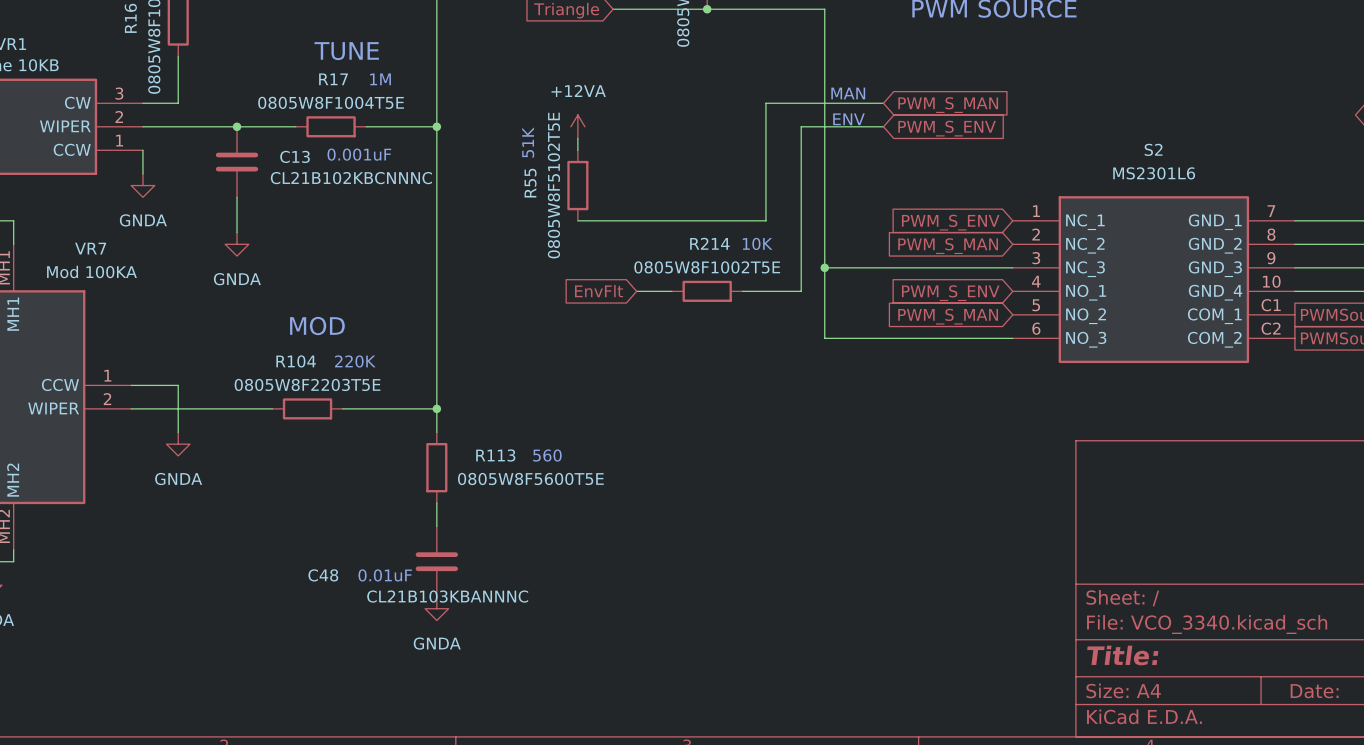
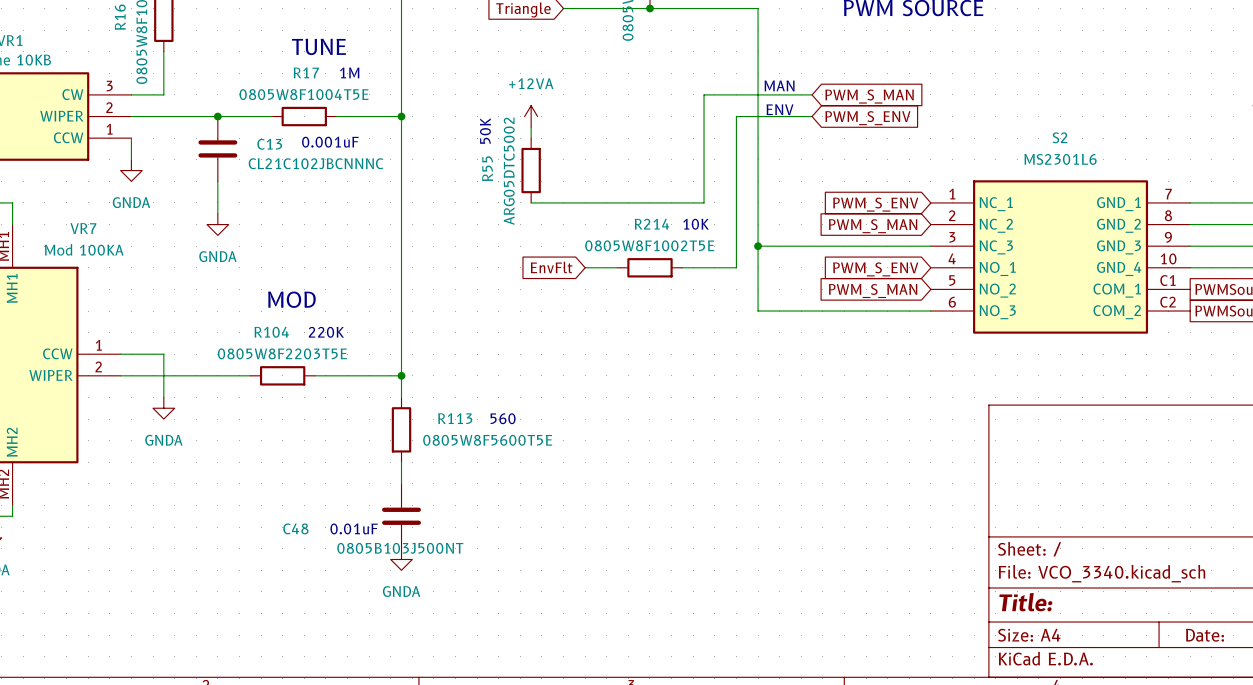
text: 51K (528, 142) -> 50K (485, 131)
C13 value: CL21B102KBCNNNC (351, 178) -> CL21C102JBCNNNC (316, 163)
R55 value: 0805W8F5102T5E (553, 185) -> ARG05DTC5002 (509, 171)
C48 value: CL21B103KBANNNC (447, 596) -> 0805B103J500NT (400, 548)

